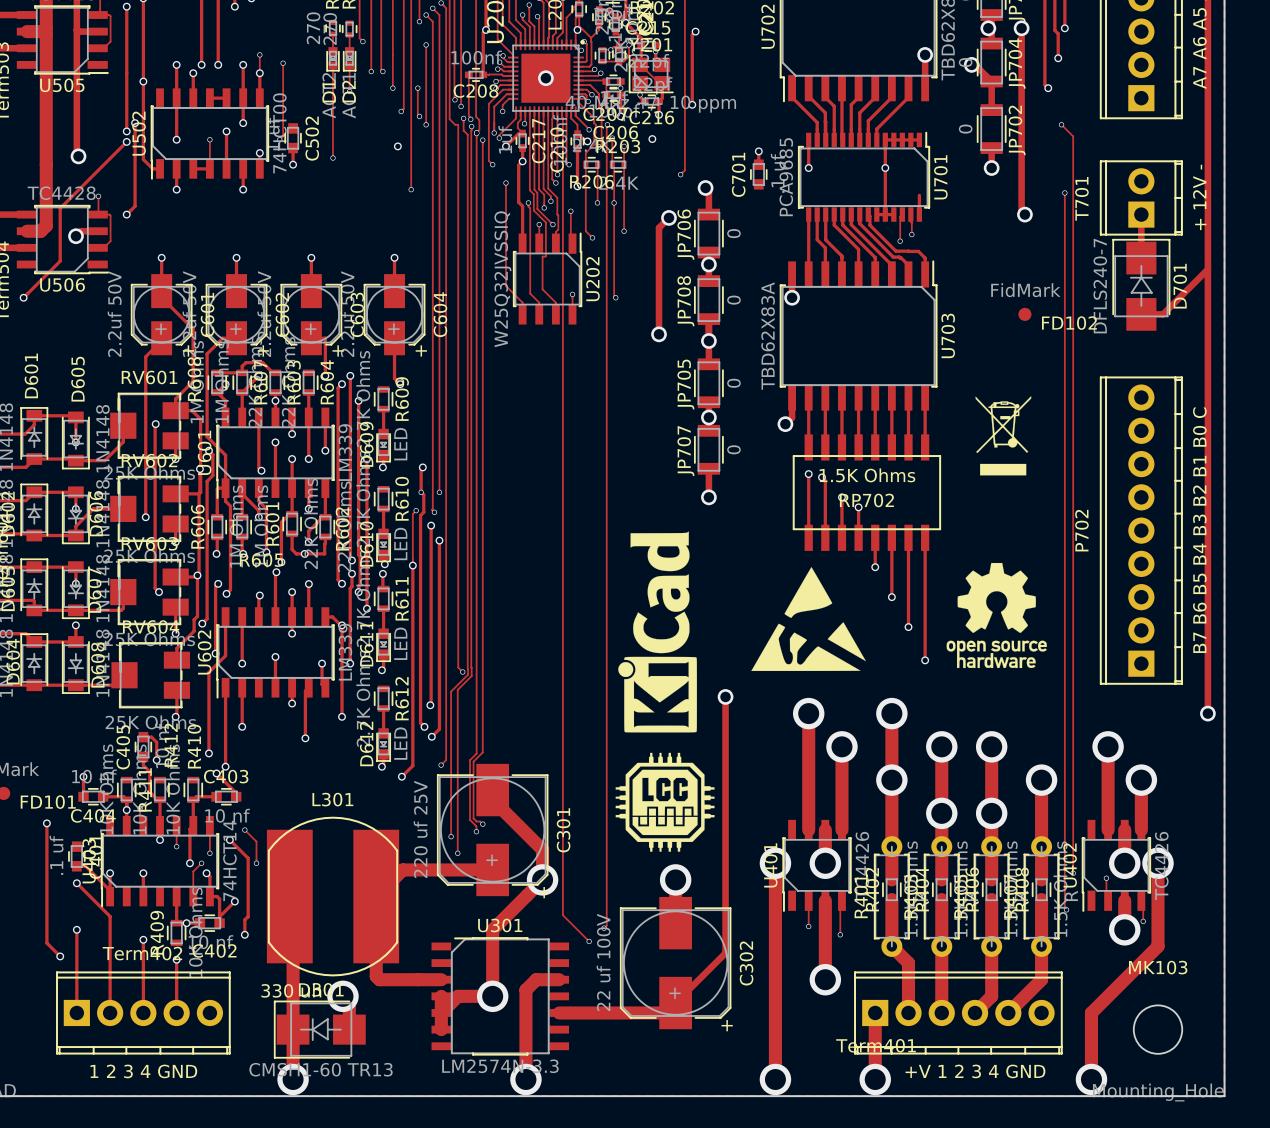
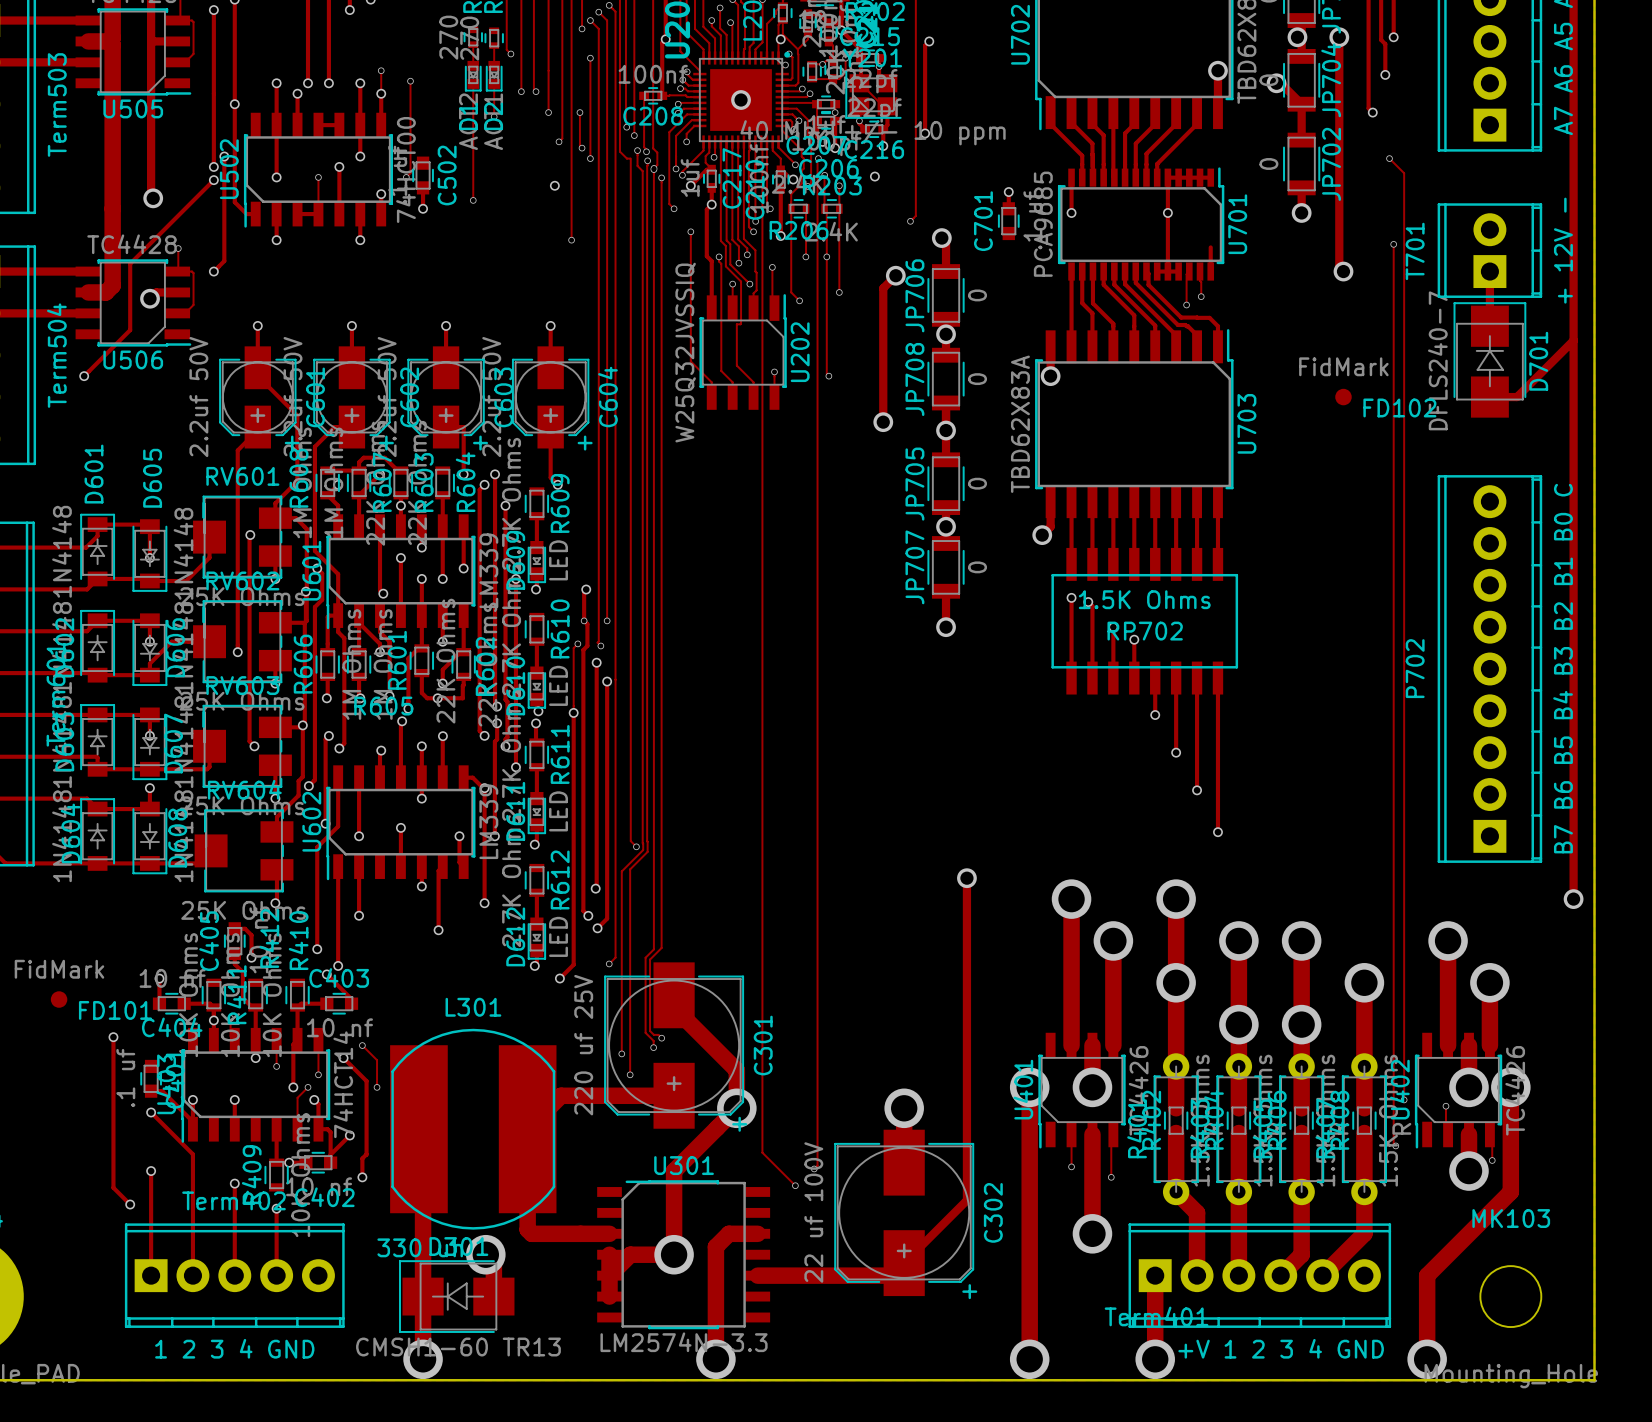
drawing: [975, 396, 1032, 476] -> none
drawing: [618, 531, 697, 733] -> none
drawing: [946, 562, 1047, 669] -> none
drawing: [751, 567, 866, 672] -> none
drawing: [615, 752, 715, 852] -> none

